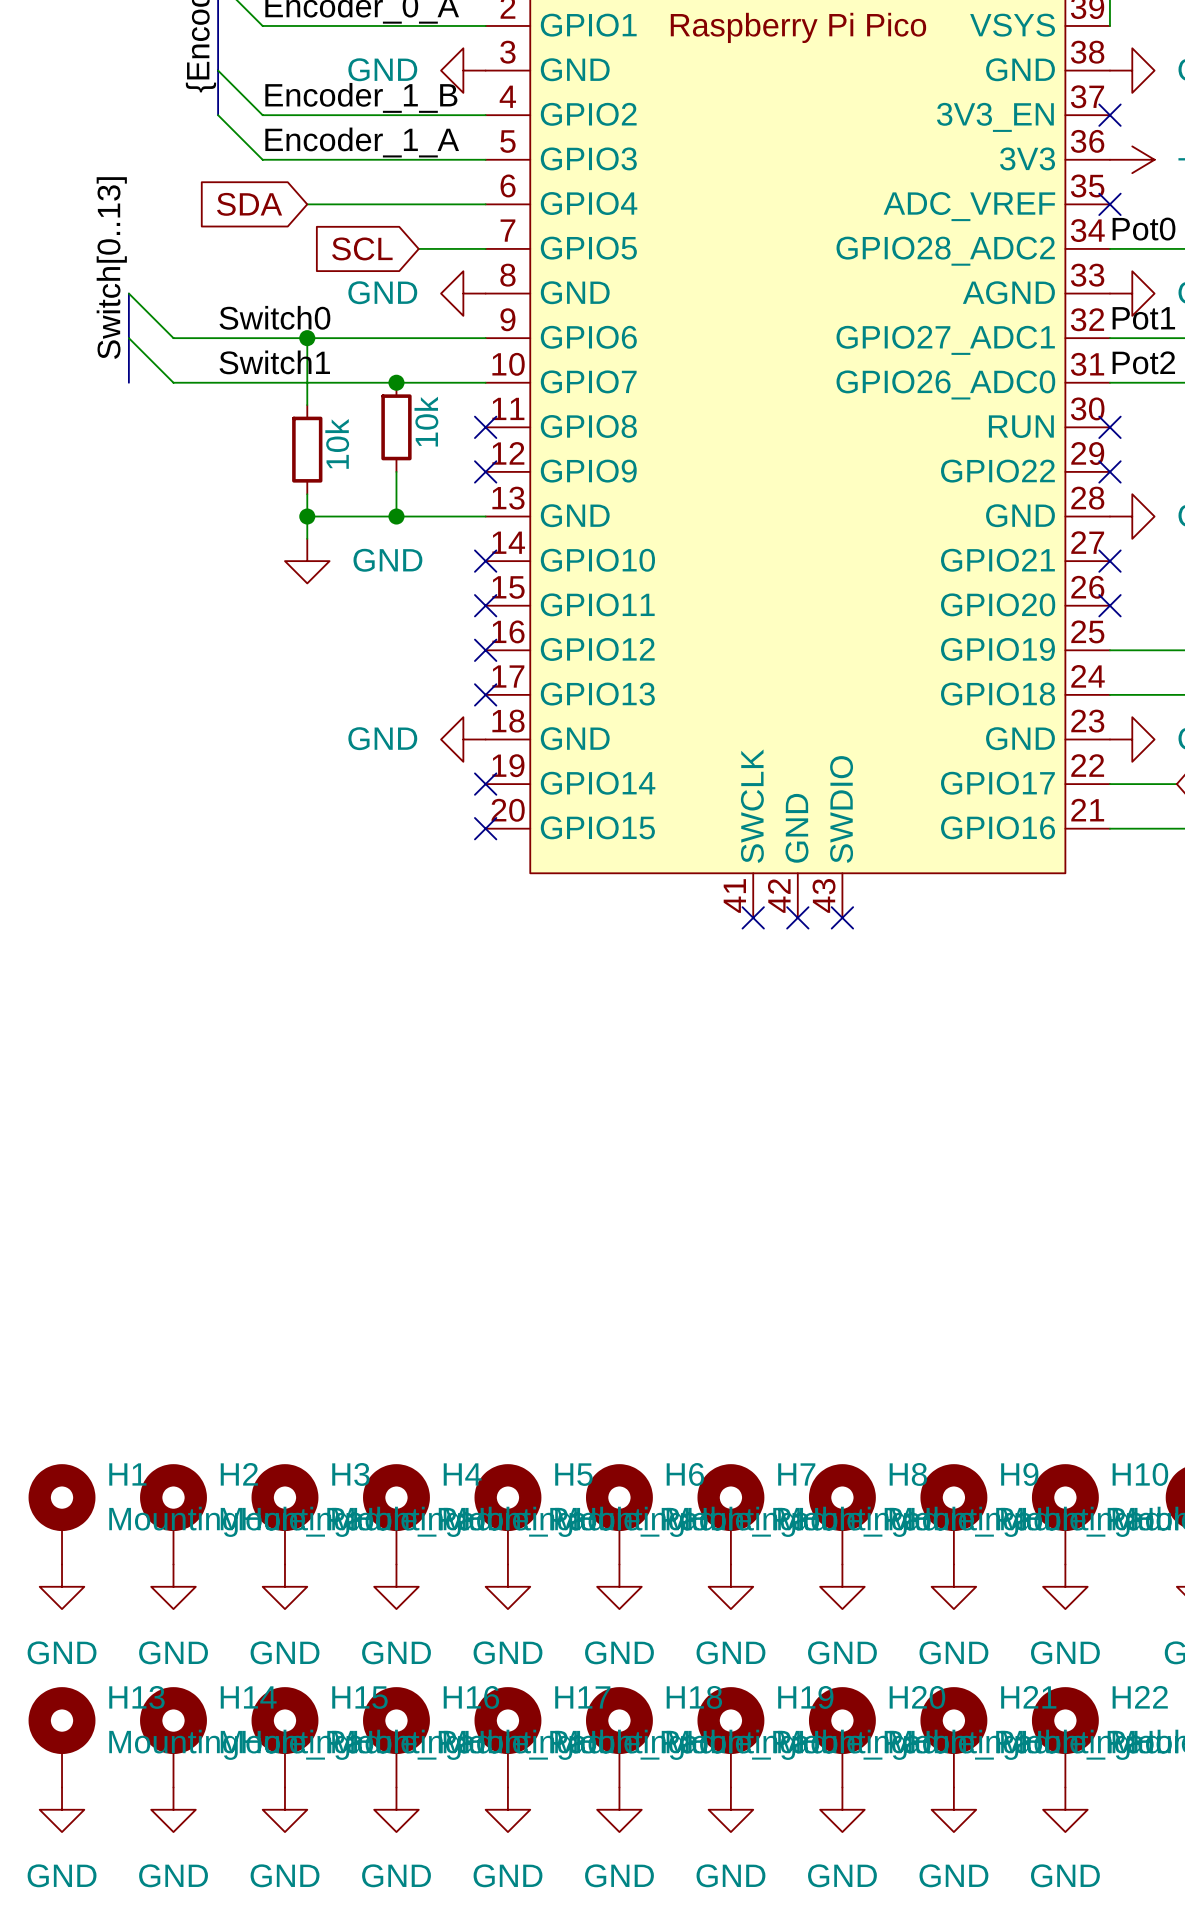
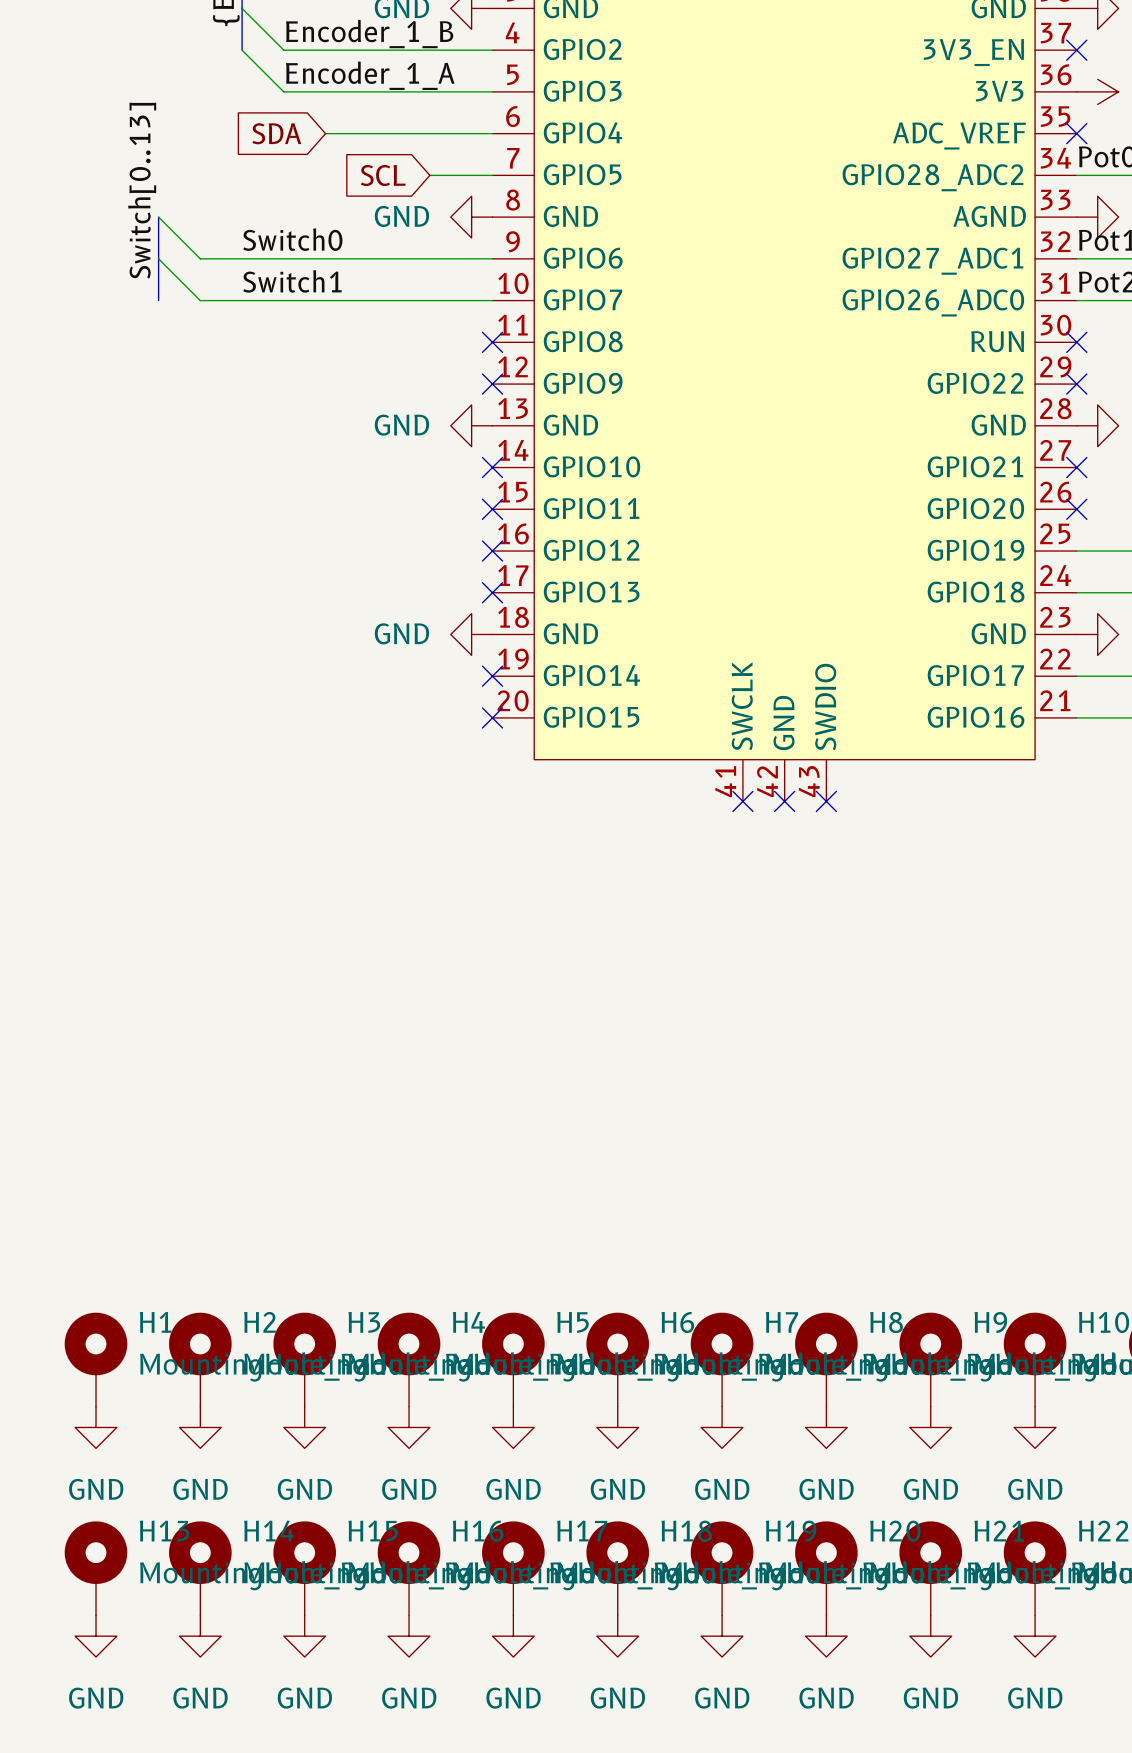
wire: (307, 338) (307, 405) -> none
junction: (307, 338) -> none
junction: (396, 382) -> none
part: 10k (396, 427) -> none
part: 10k (307, 449) -> none
wire: (396, 471) (396, 516) -> none
wire: (307, 494) (307, 538) -> none
wire: (307, 516) (485, 516) -> none
junction: (307, 516) -> none
junction: (396, 516) -> none
power symbol text position: GND (387, 560) -> GND (401, 425)
power symbol rotation: 0° (307, 561) -> 90° clockwise (471, 425)
power symbol position: GND (307, 561) -> GND (471, 425)

